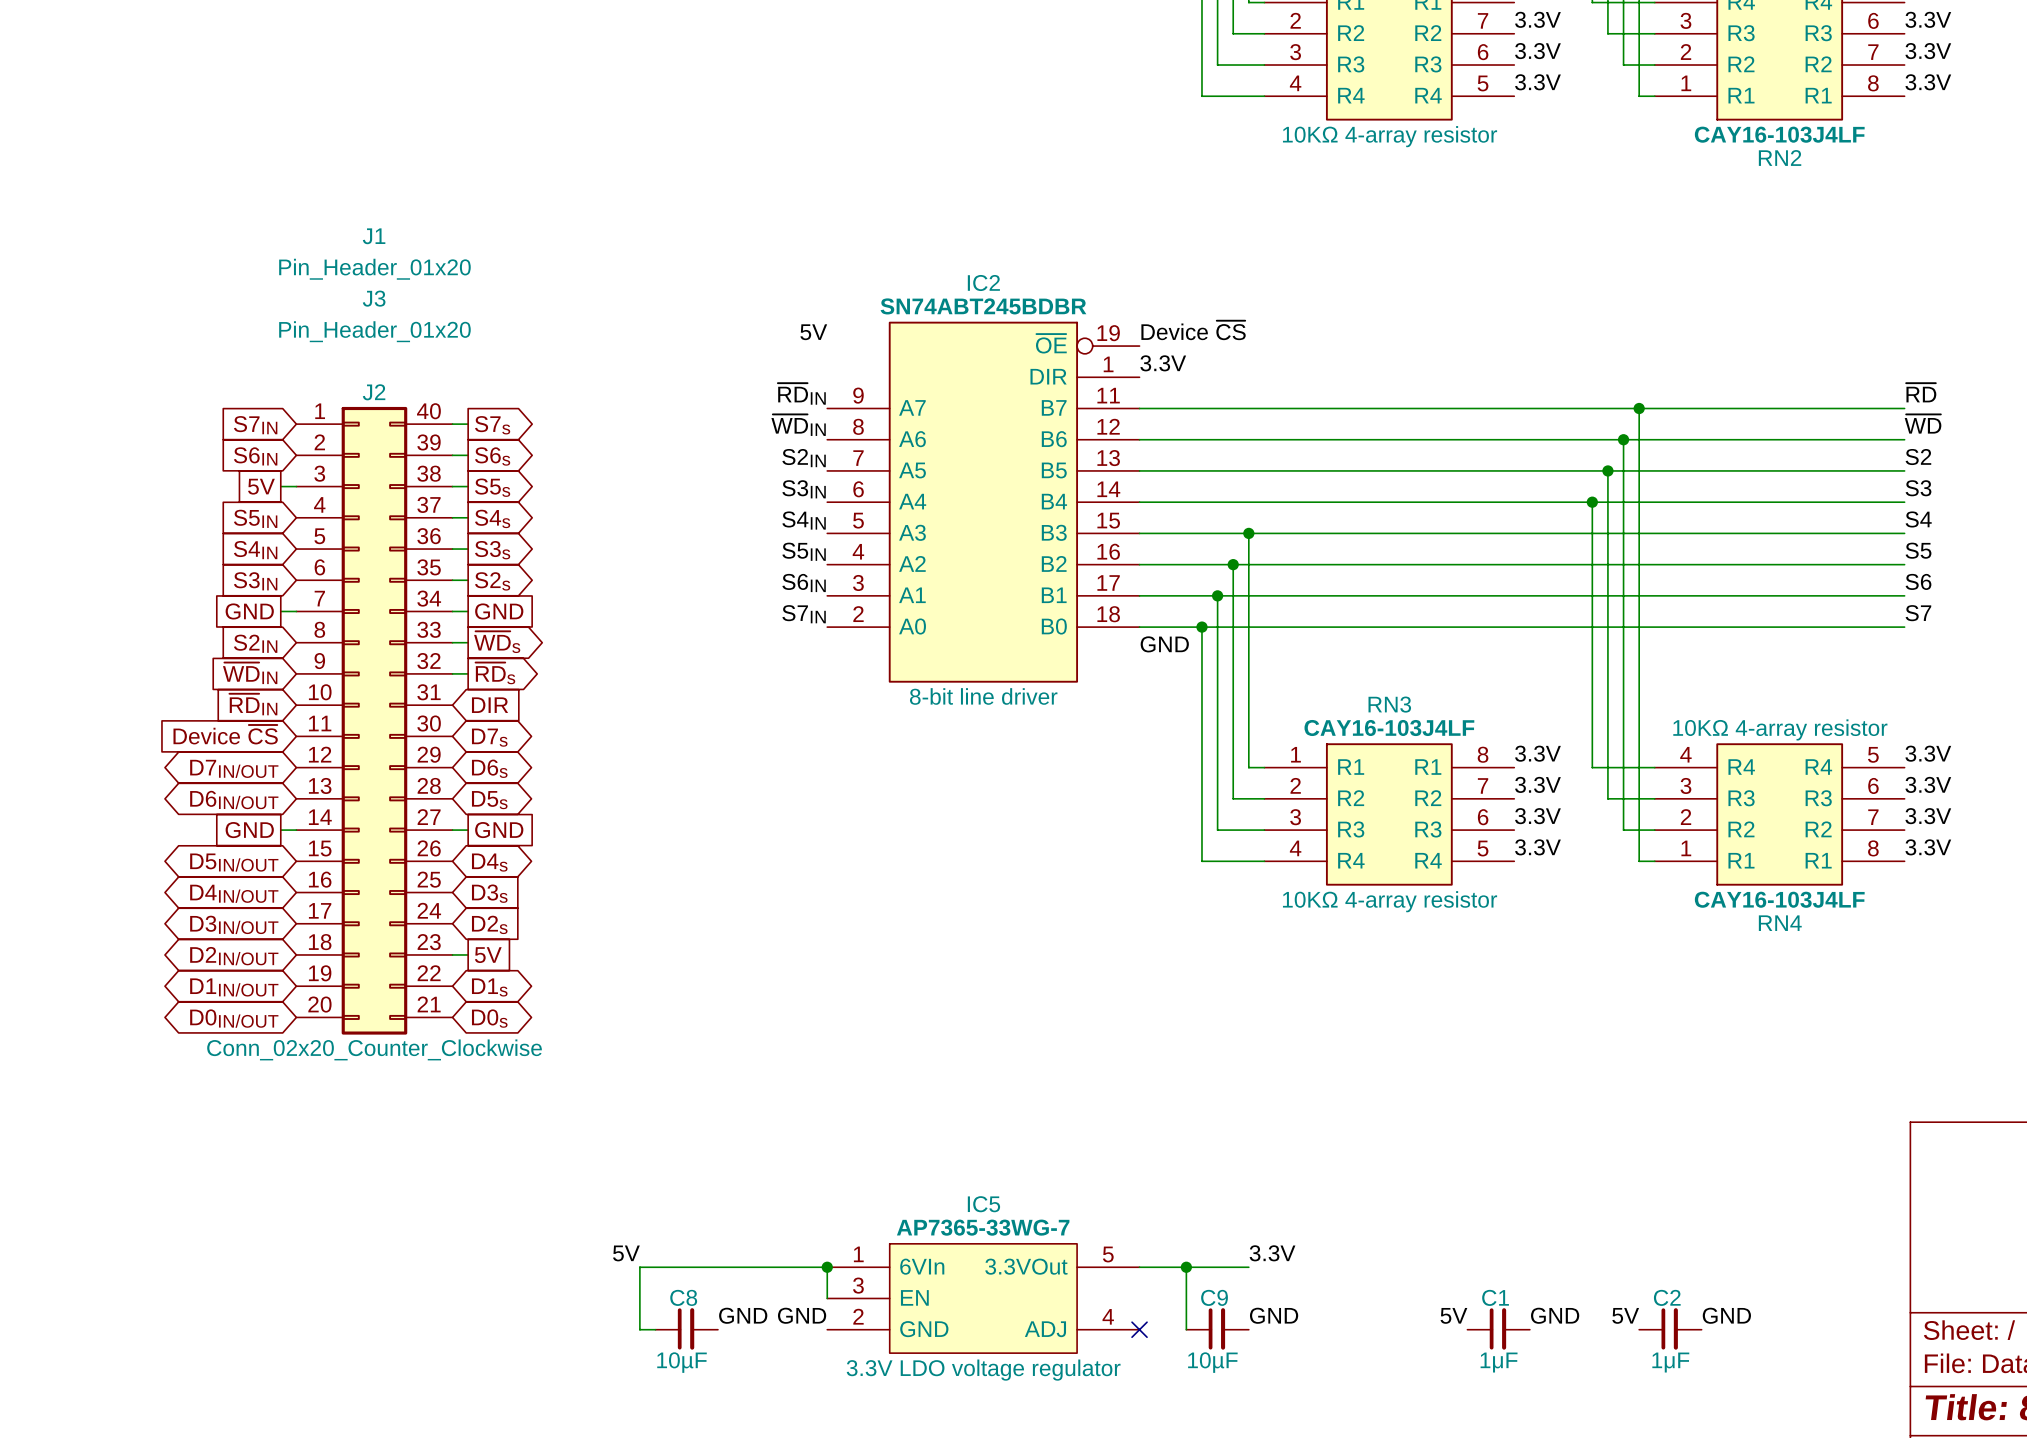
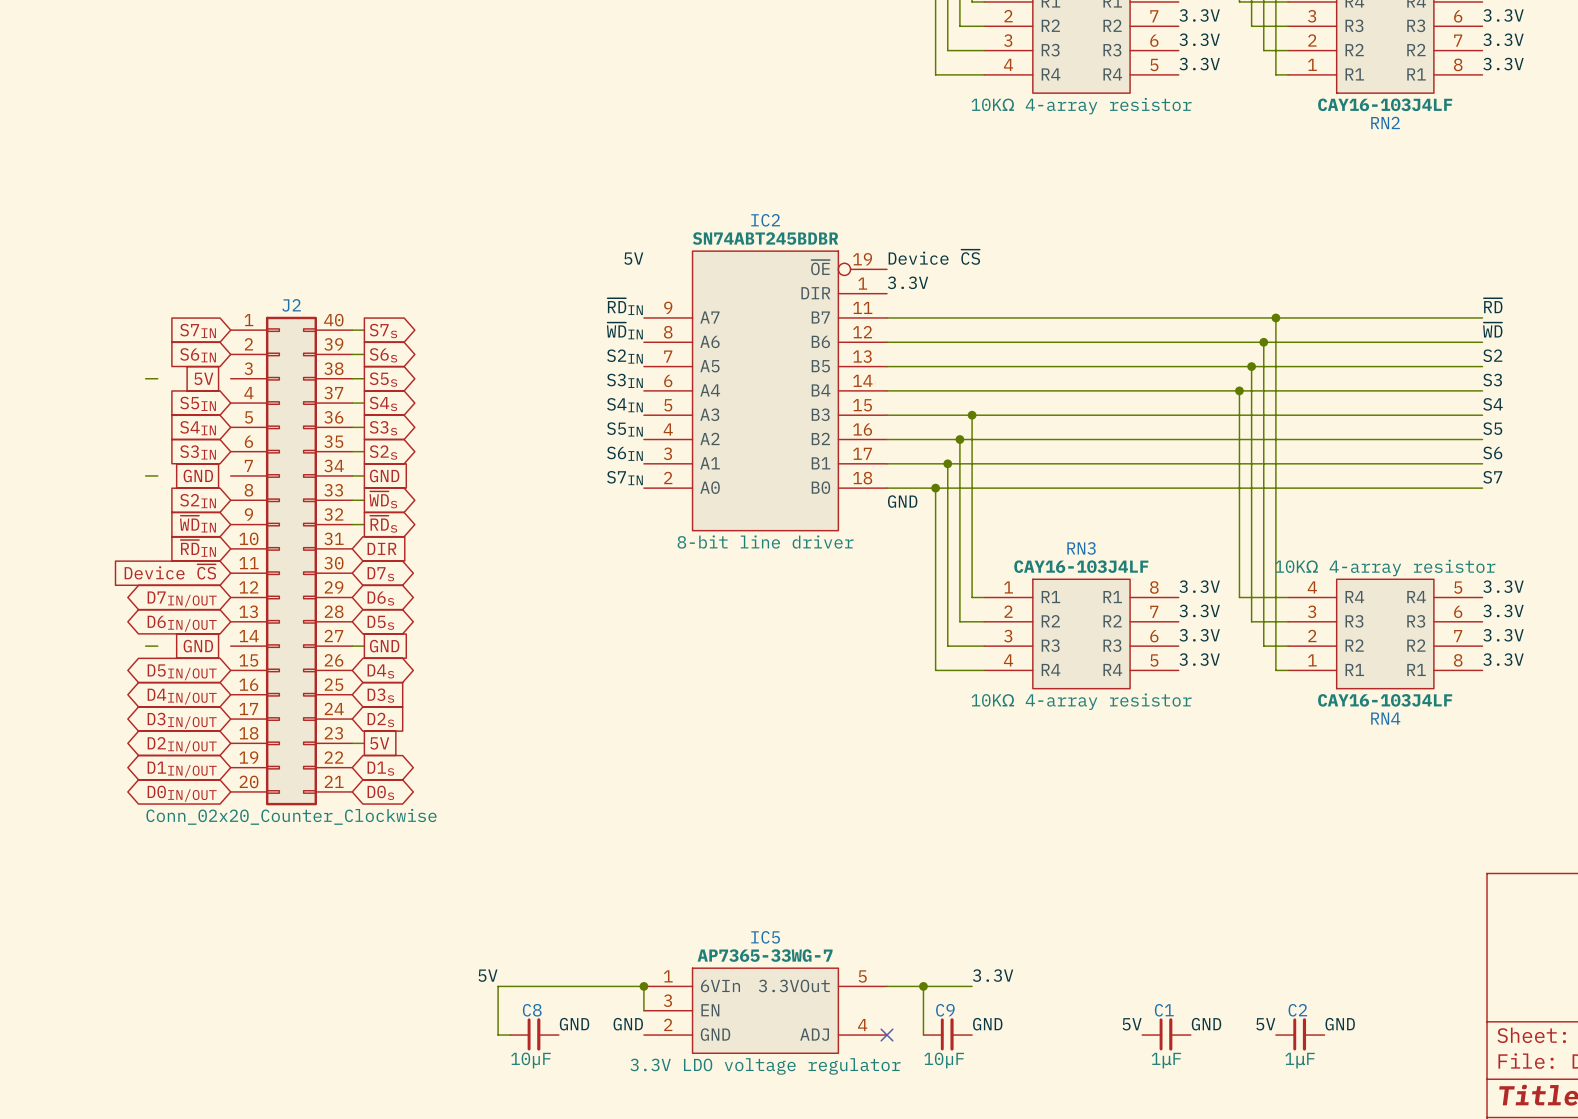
J1: Pin_Header_01x20 (374, 254) -> none
J3: Pin_Header_01x20 (374, 316) -> none
wire: (280, 486) (296, 486) -> (145, 378) (157, 378)
wire: (280, 611) (296, 611) -> (145, 475) (157, 475)
wire: (280, 830) (296, 830) -> (145, 646) (157, 646)

